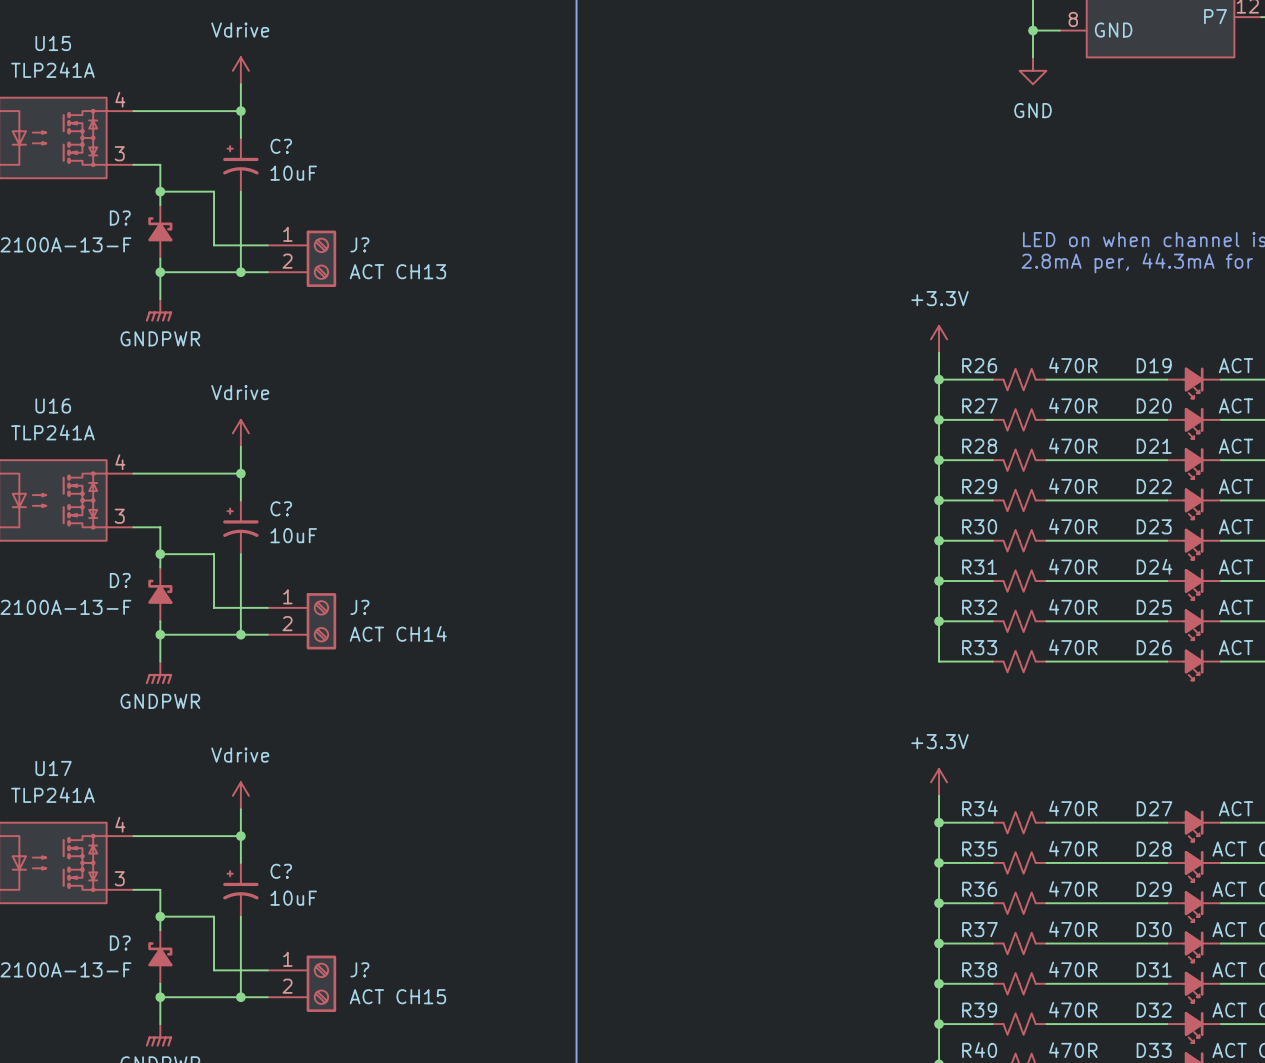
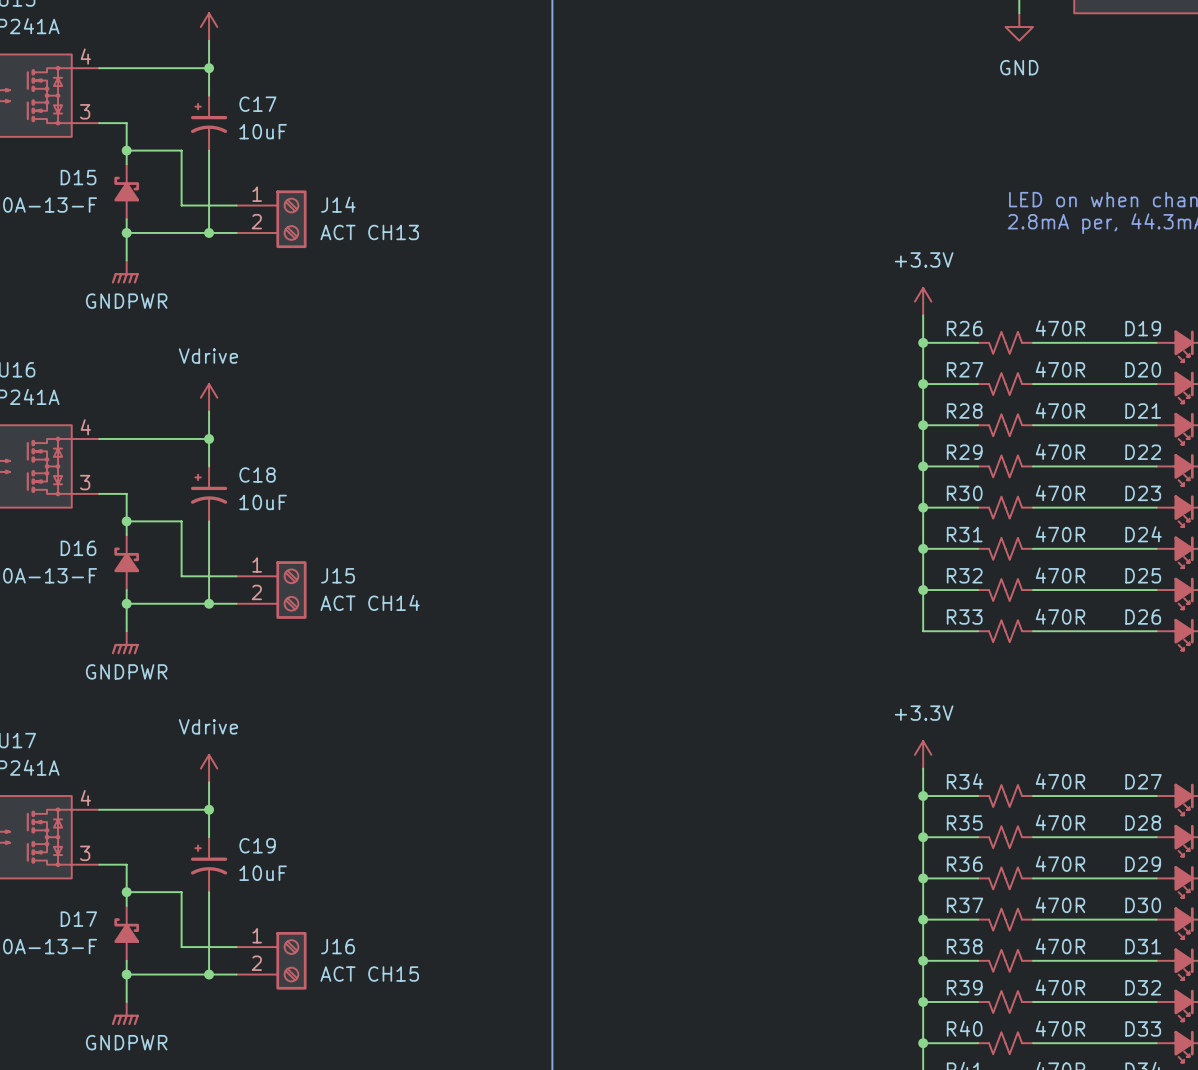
C? name: C? (281, 146) -> C17 (257, 104)
D? name: D? (120, 218) -> D15 (78, 177)
J? name: J? (359, 244) -> J14 (338, 204)
C? name: C? (281, 508) -> C18 (257, 474)
D? name: D? (120, 580) -> D16 (78, 548)
J? name: J? (359, 607) -> J15 (338, 575)
C? name: C? (281, 871) -> C19 (257, 845)
D? name: D? (120, 943) -> D17 (78, 919)
J? name: J? (359, 969) -> J16 (338, 946)

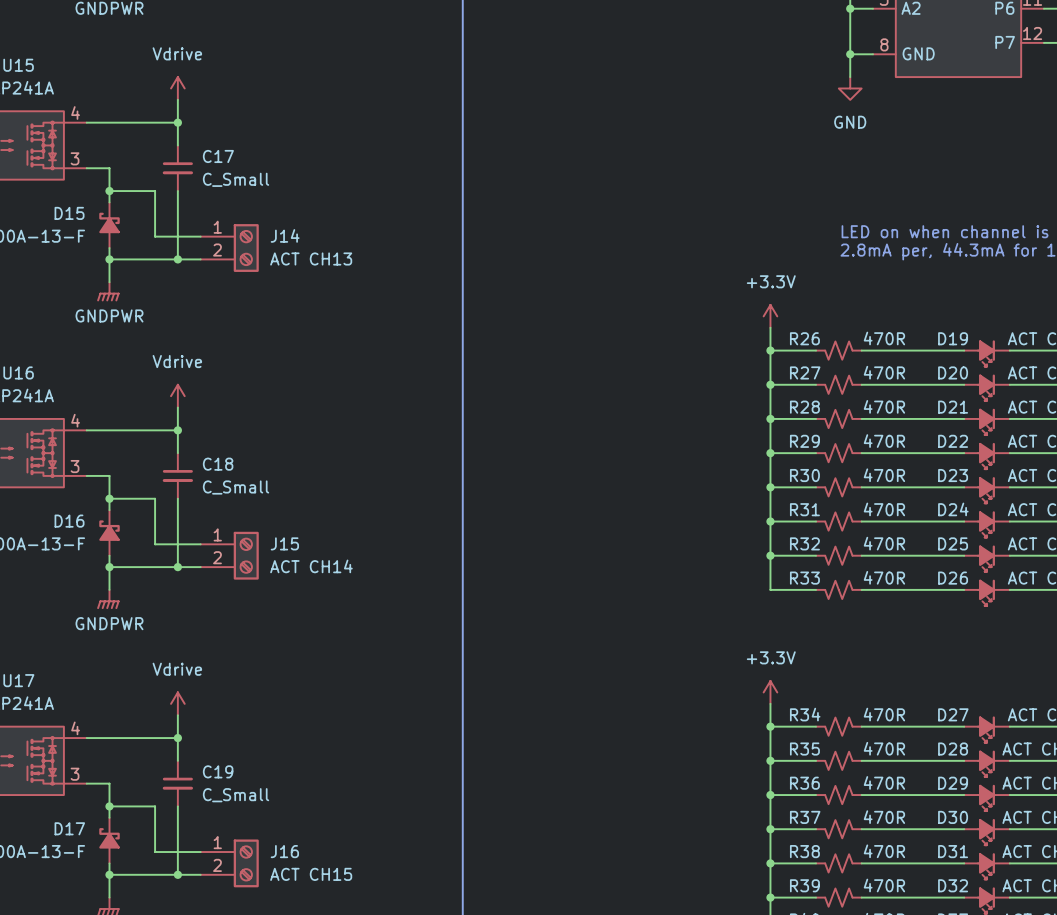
C17 symbol: [190, 95, 228, 151] -> [162, 145, 194, 192]
C17 value: 10uF (263, 131) -> C_Small (236, 179)
C18 symbol: [190, 466, 228, 522] -> [162, 453, 194, 499]
C18 value: 10uF (263, 502) -> C_Small (236, 487)
C19 symbol: [190, 837, 228, 893] -> [162, 760, 194, 807]
C19 value: 10uF (263, 873) -> C_Small (236, 795)

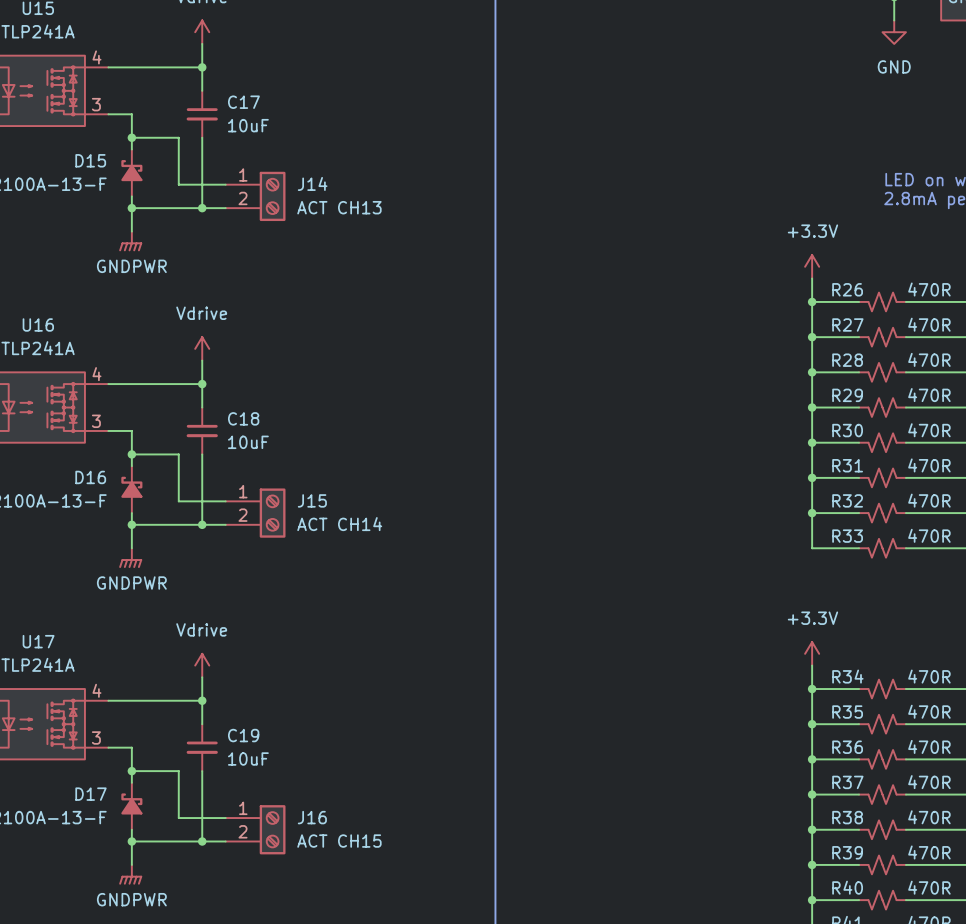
C17 value: C_Small (236, 179) -> 10uF (248, 125)
C18 value: C_Small (236, 487) -> 10uF (248, 442)
C19 value: C_Small (236, 795) -> 10uF (248, 759)

